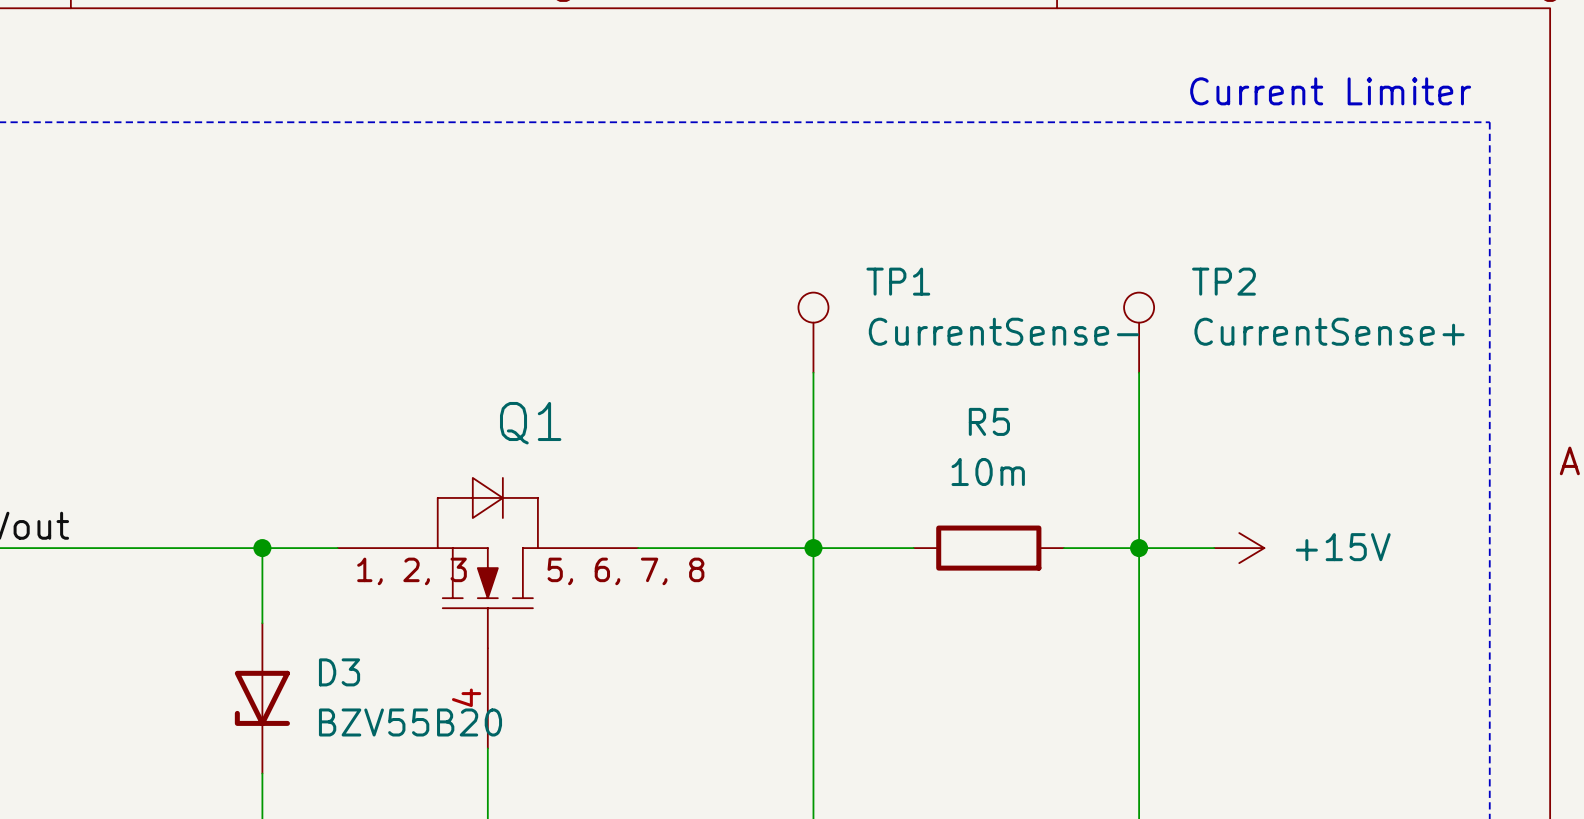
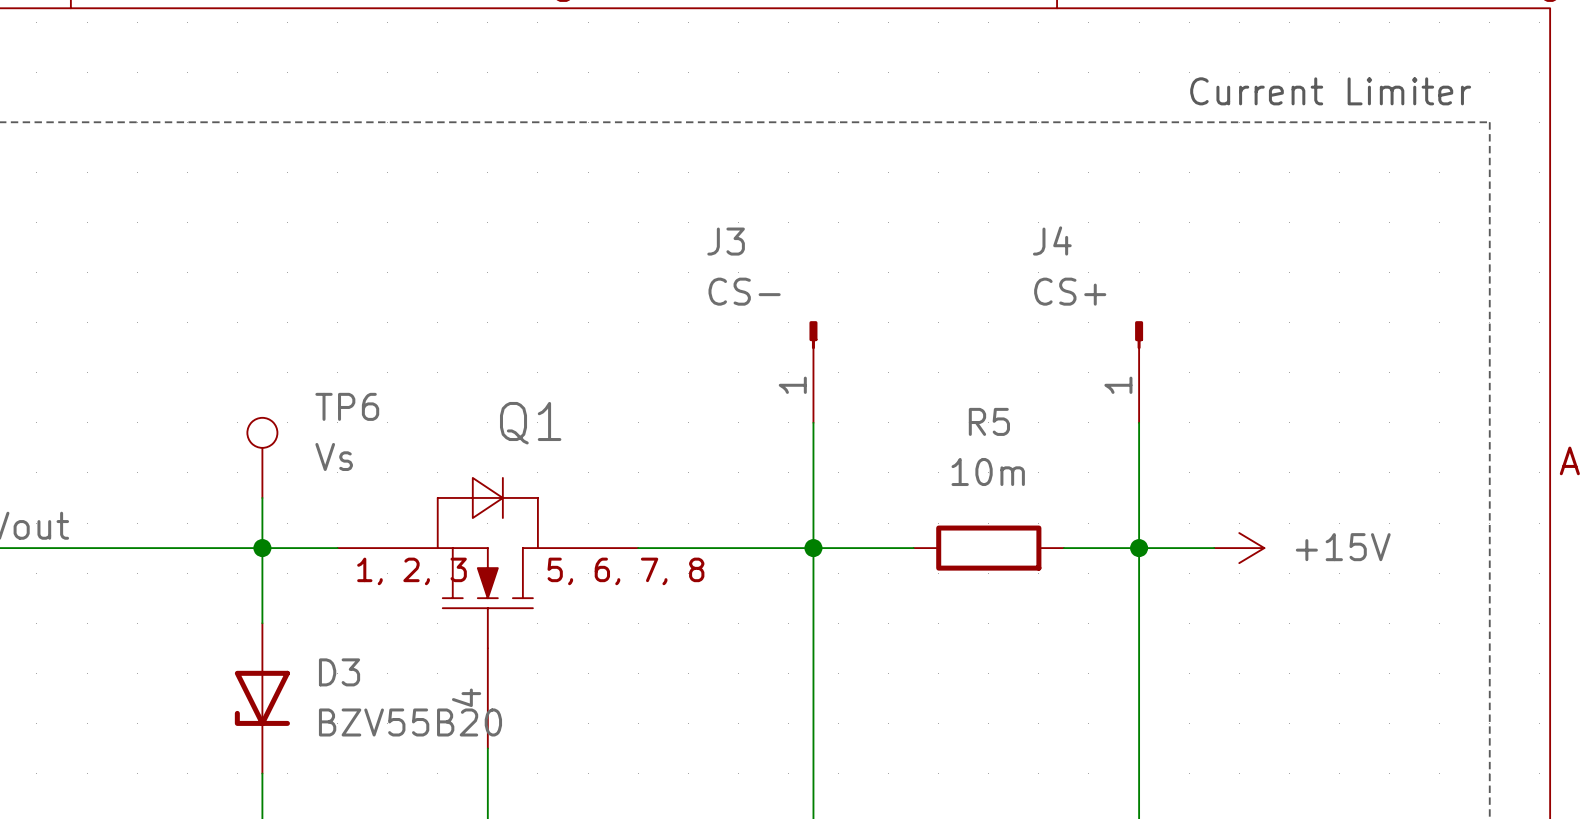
TP1: CurrentSense- (813, 332) -> none
TP2: CurrentSense+ (1139, 332) -> none
J3: none -> CS- (813, 371)
J4: none -> CS+ (1139, 371)
TP6: none -> Vs (262, 457)
wire: none -> (262, 497) (262, 548)

